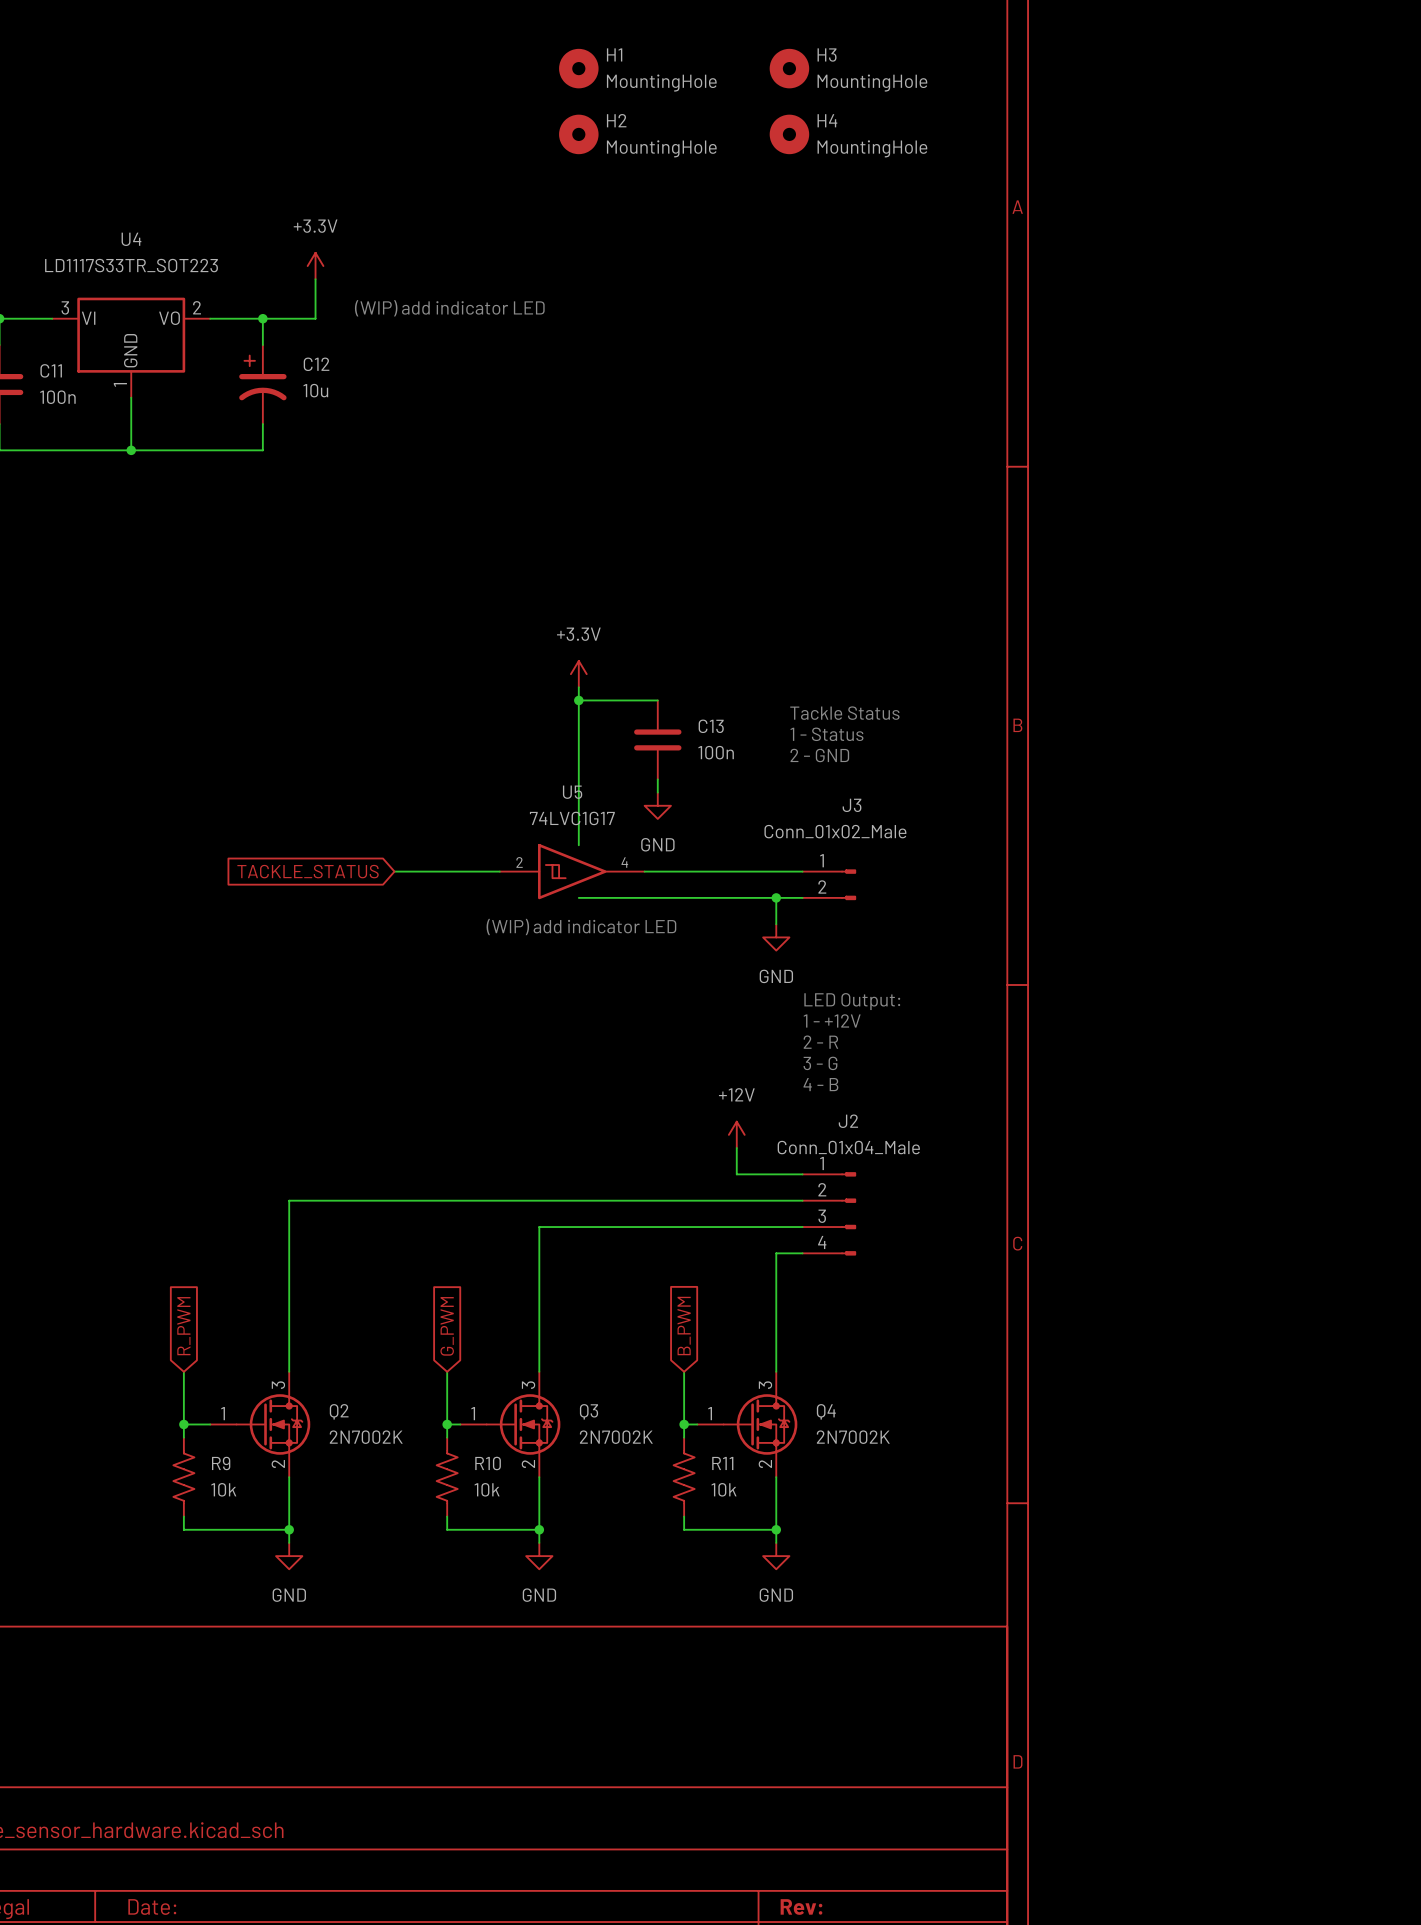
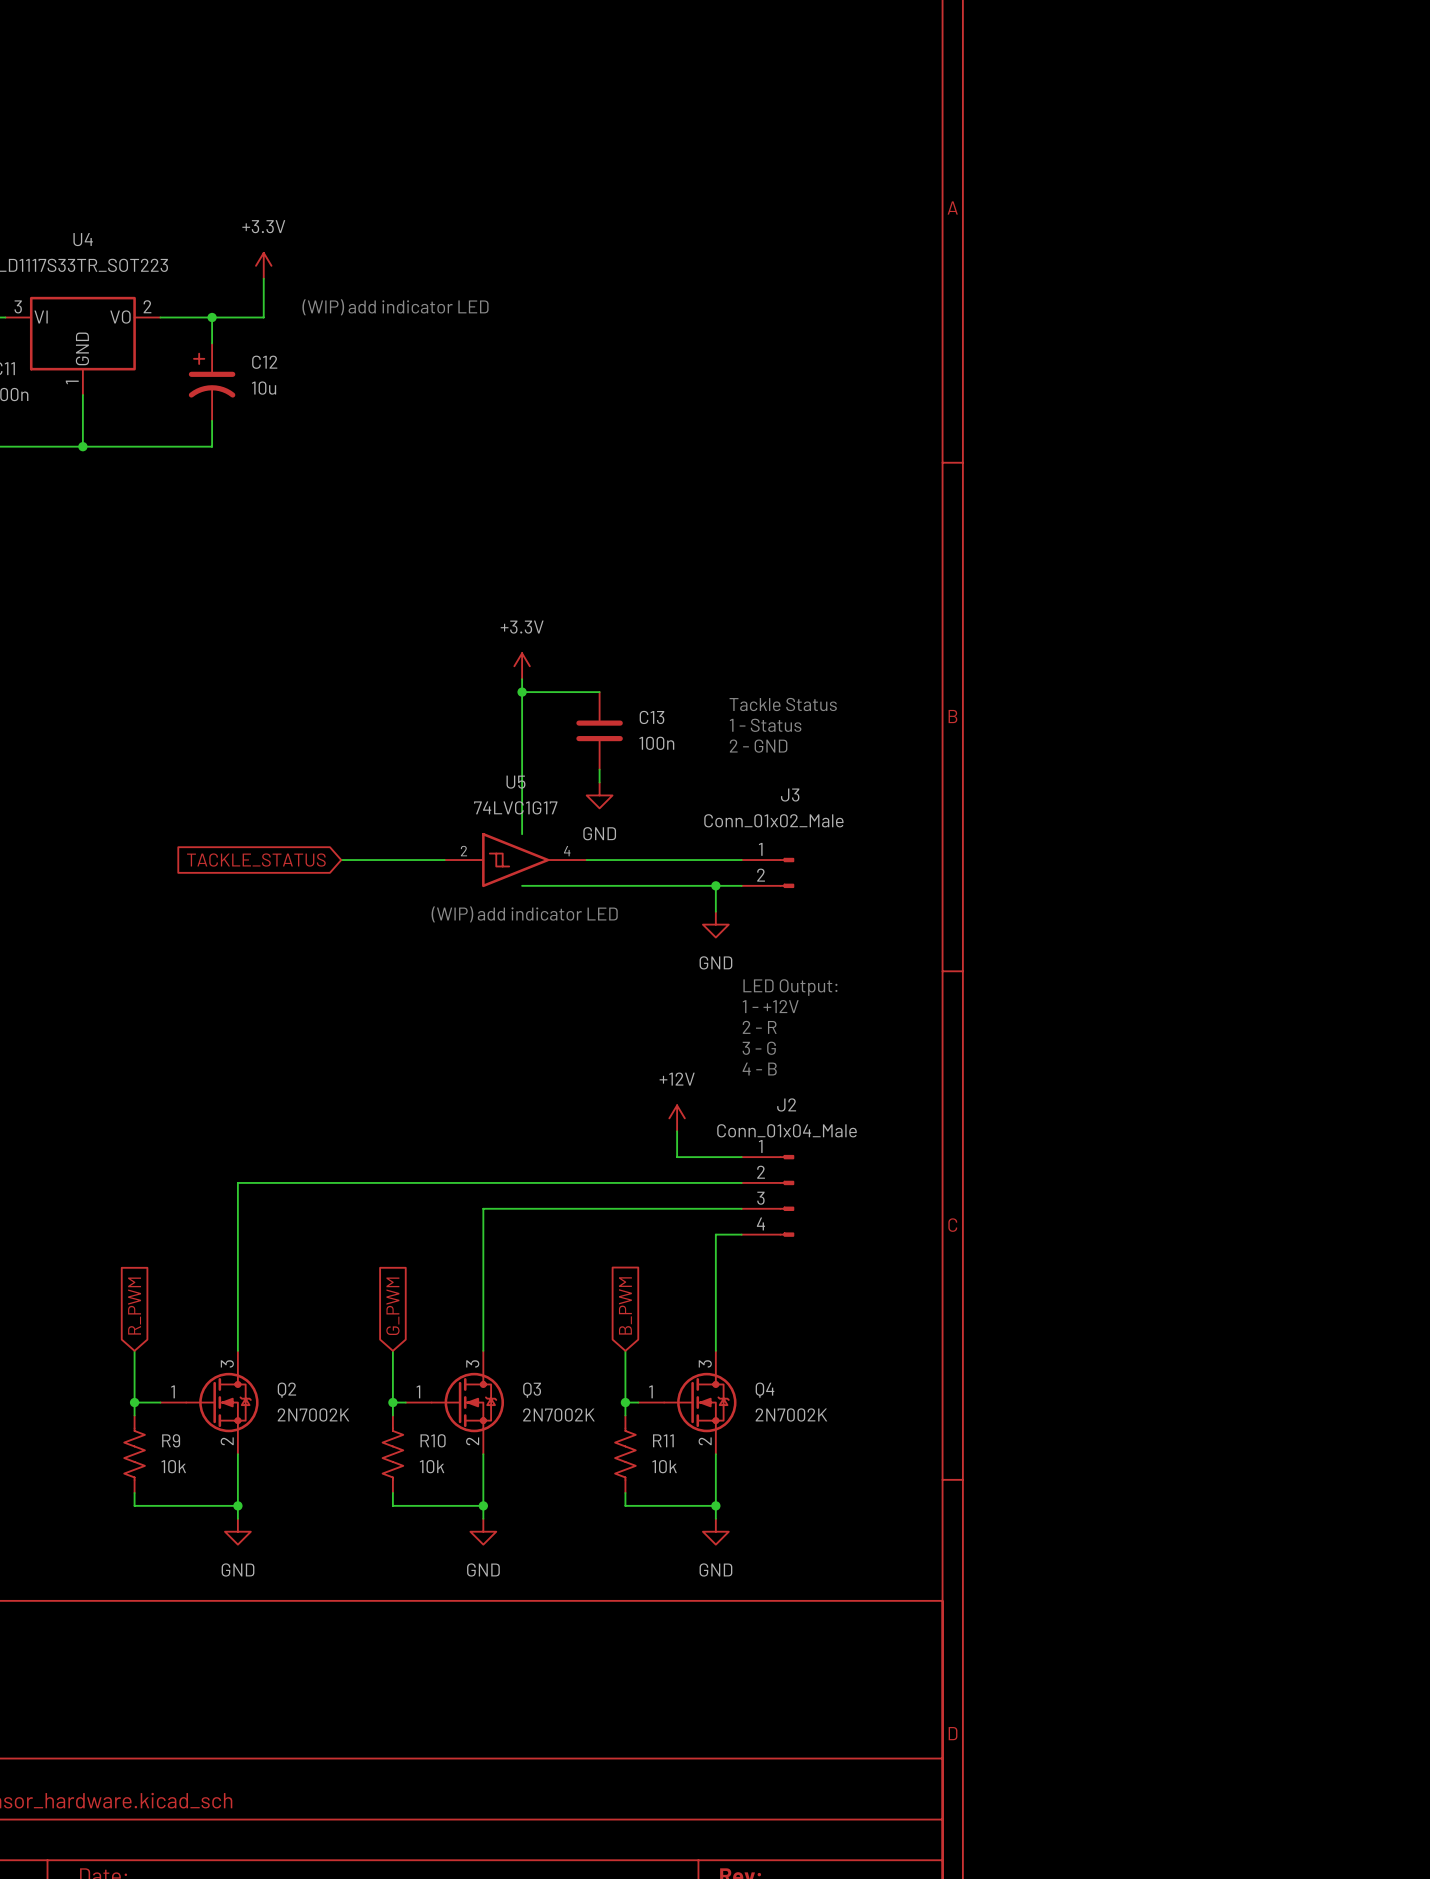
H1: MountingHole (578, 68) -> none
H3: MountingHole (789, 68) -> none
H2: MountingHole (578, 134) -> none
H4: MountingHole (789, 134) -> none

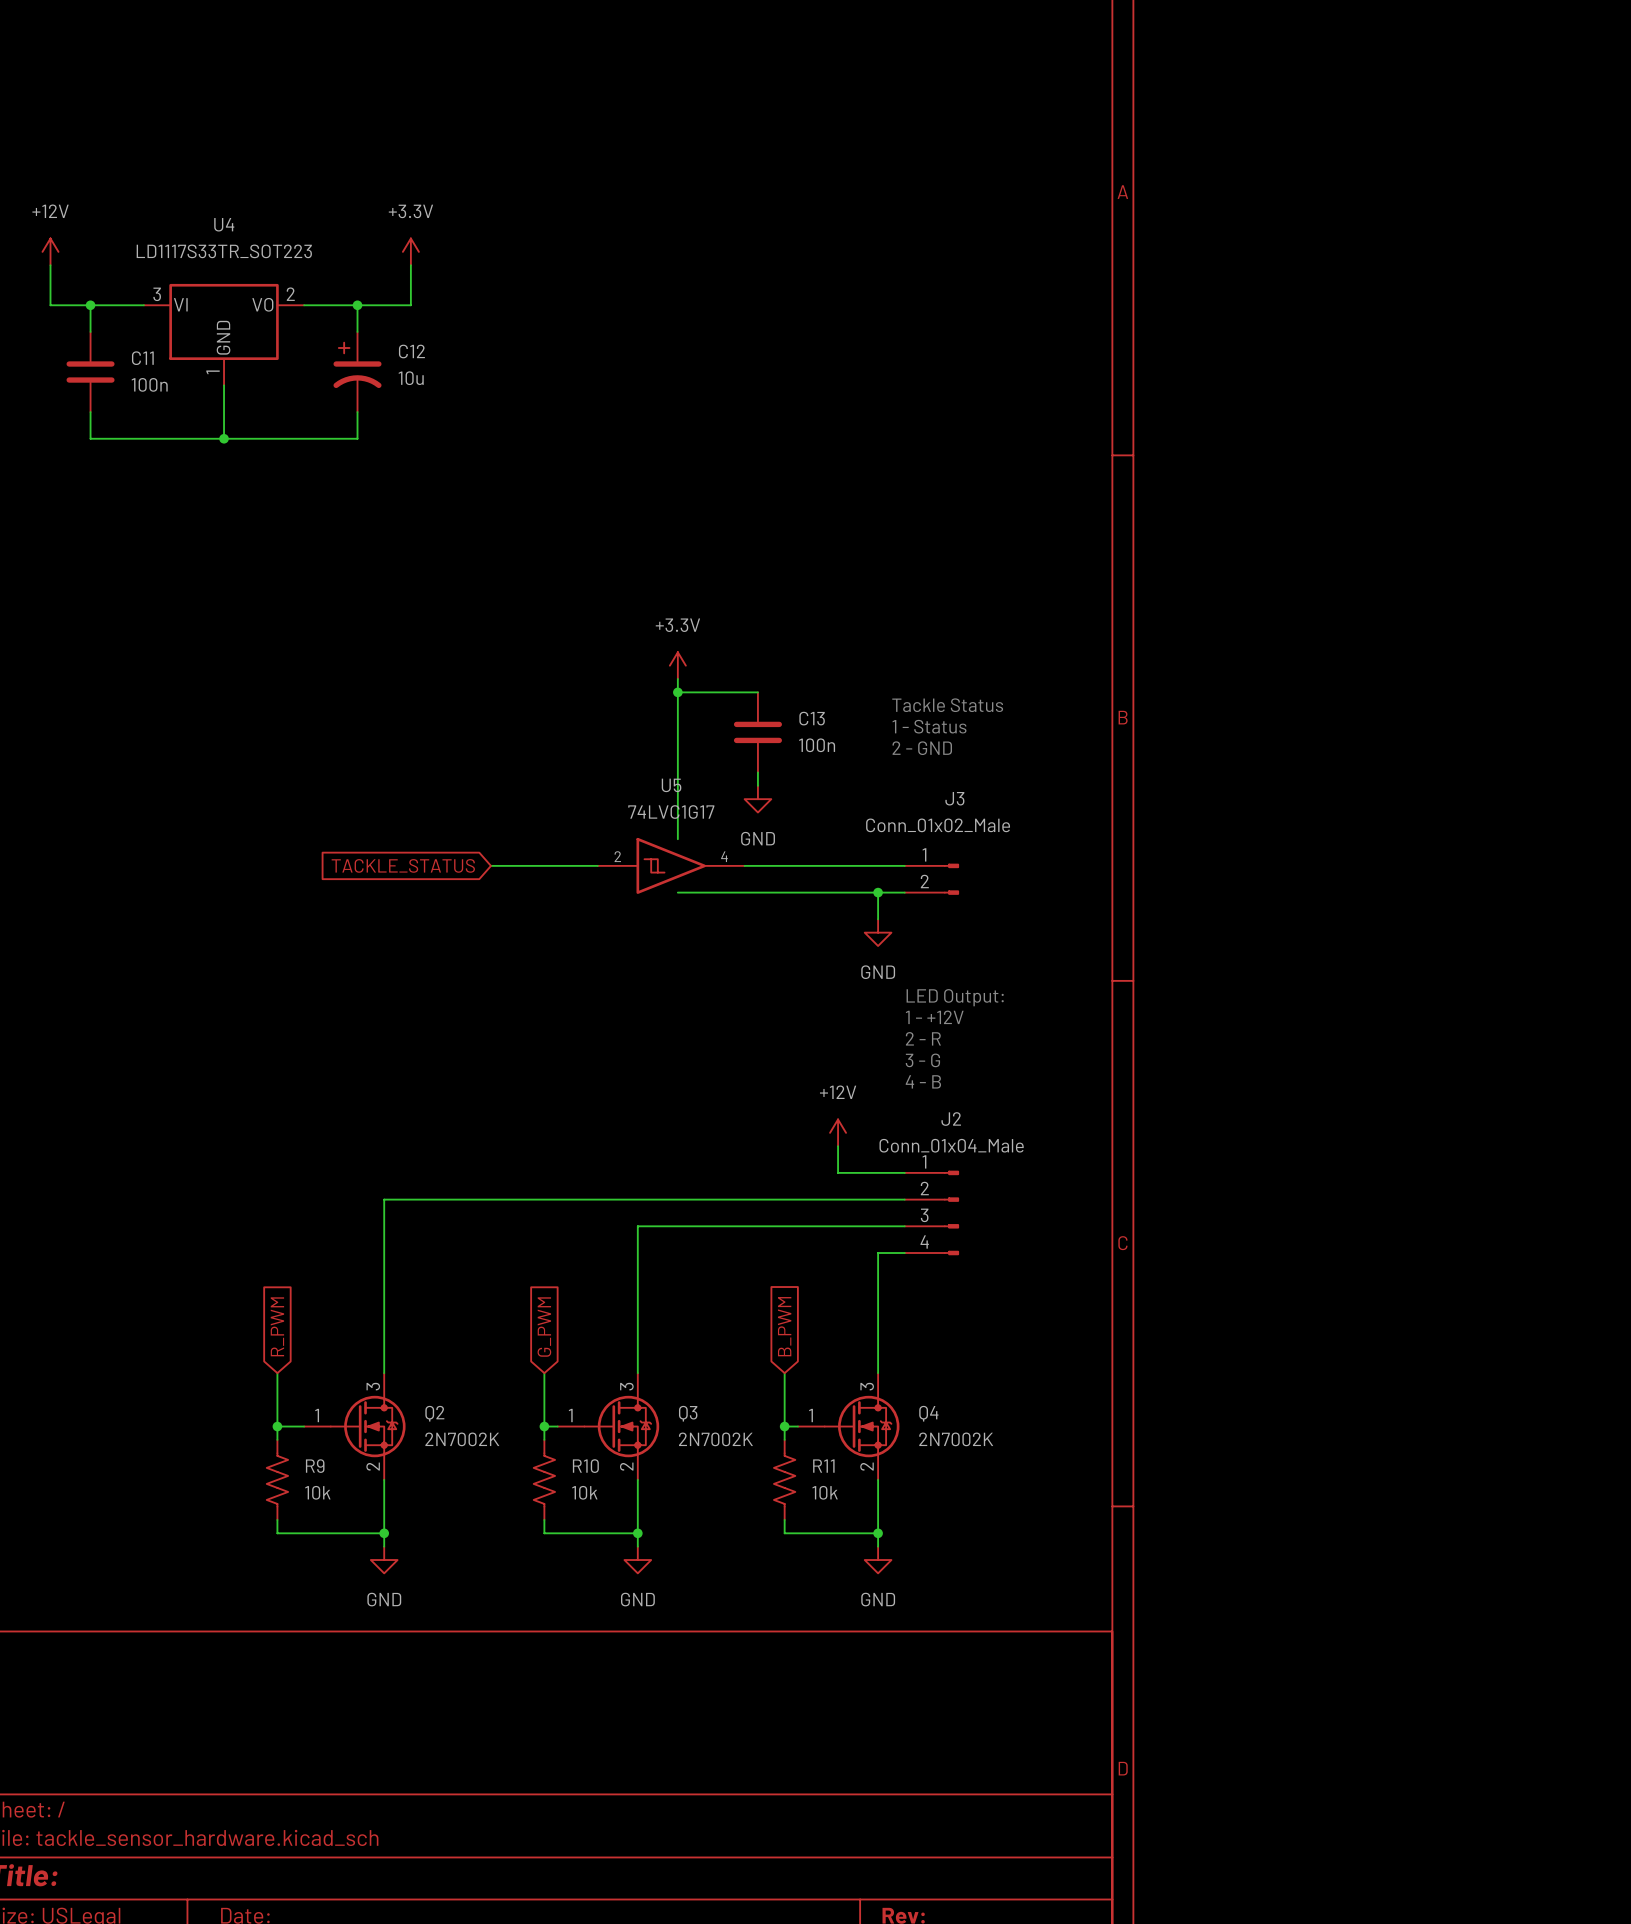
text: (WIP) add indicator LED (395, 307) -> none
text: (WIP) add indicator LED (524, 914) -> none

